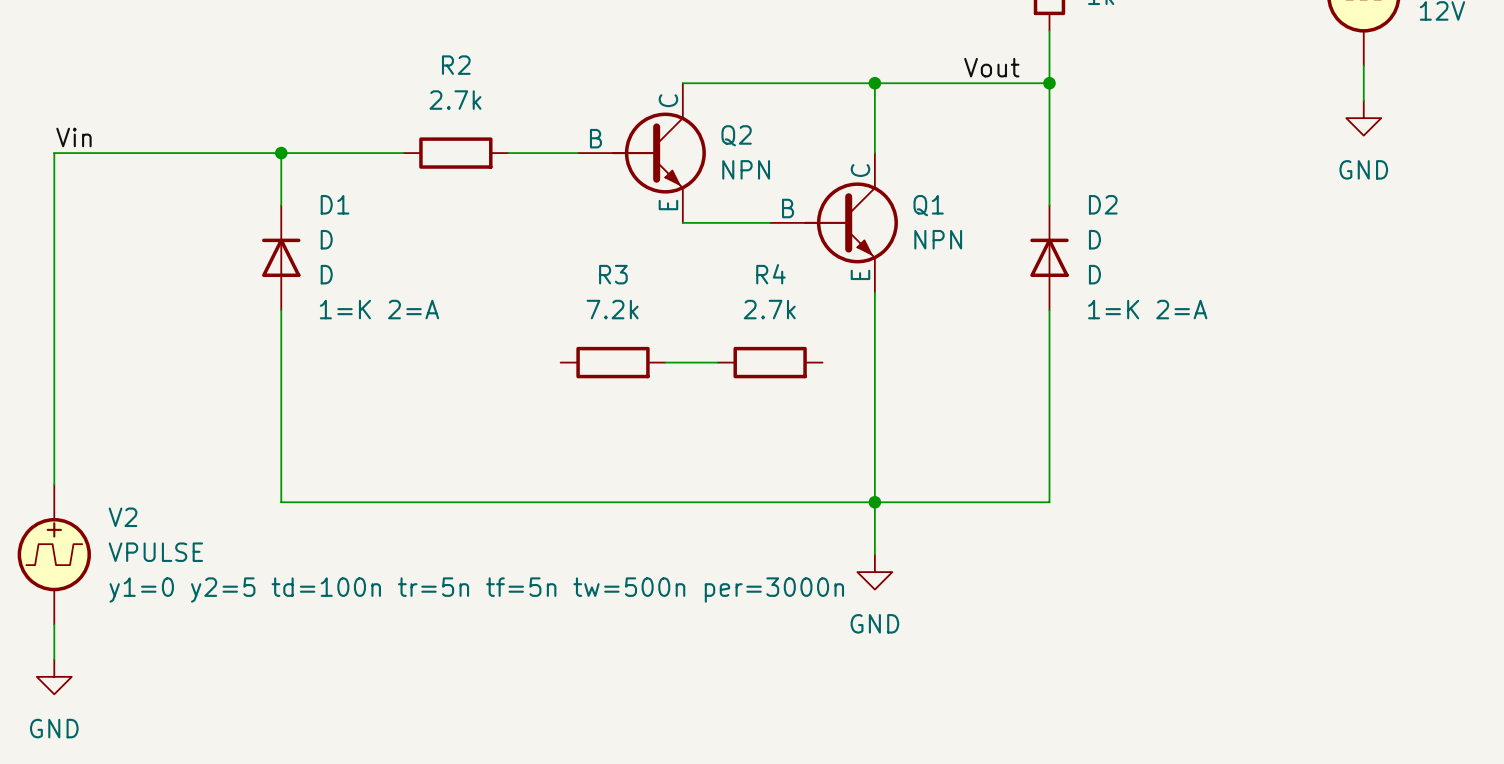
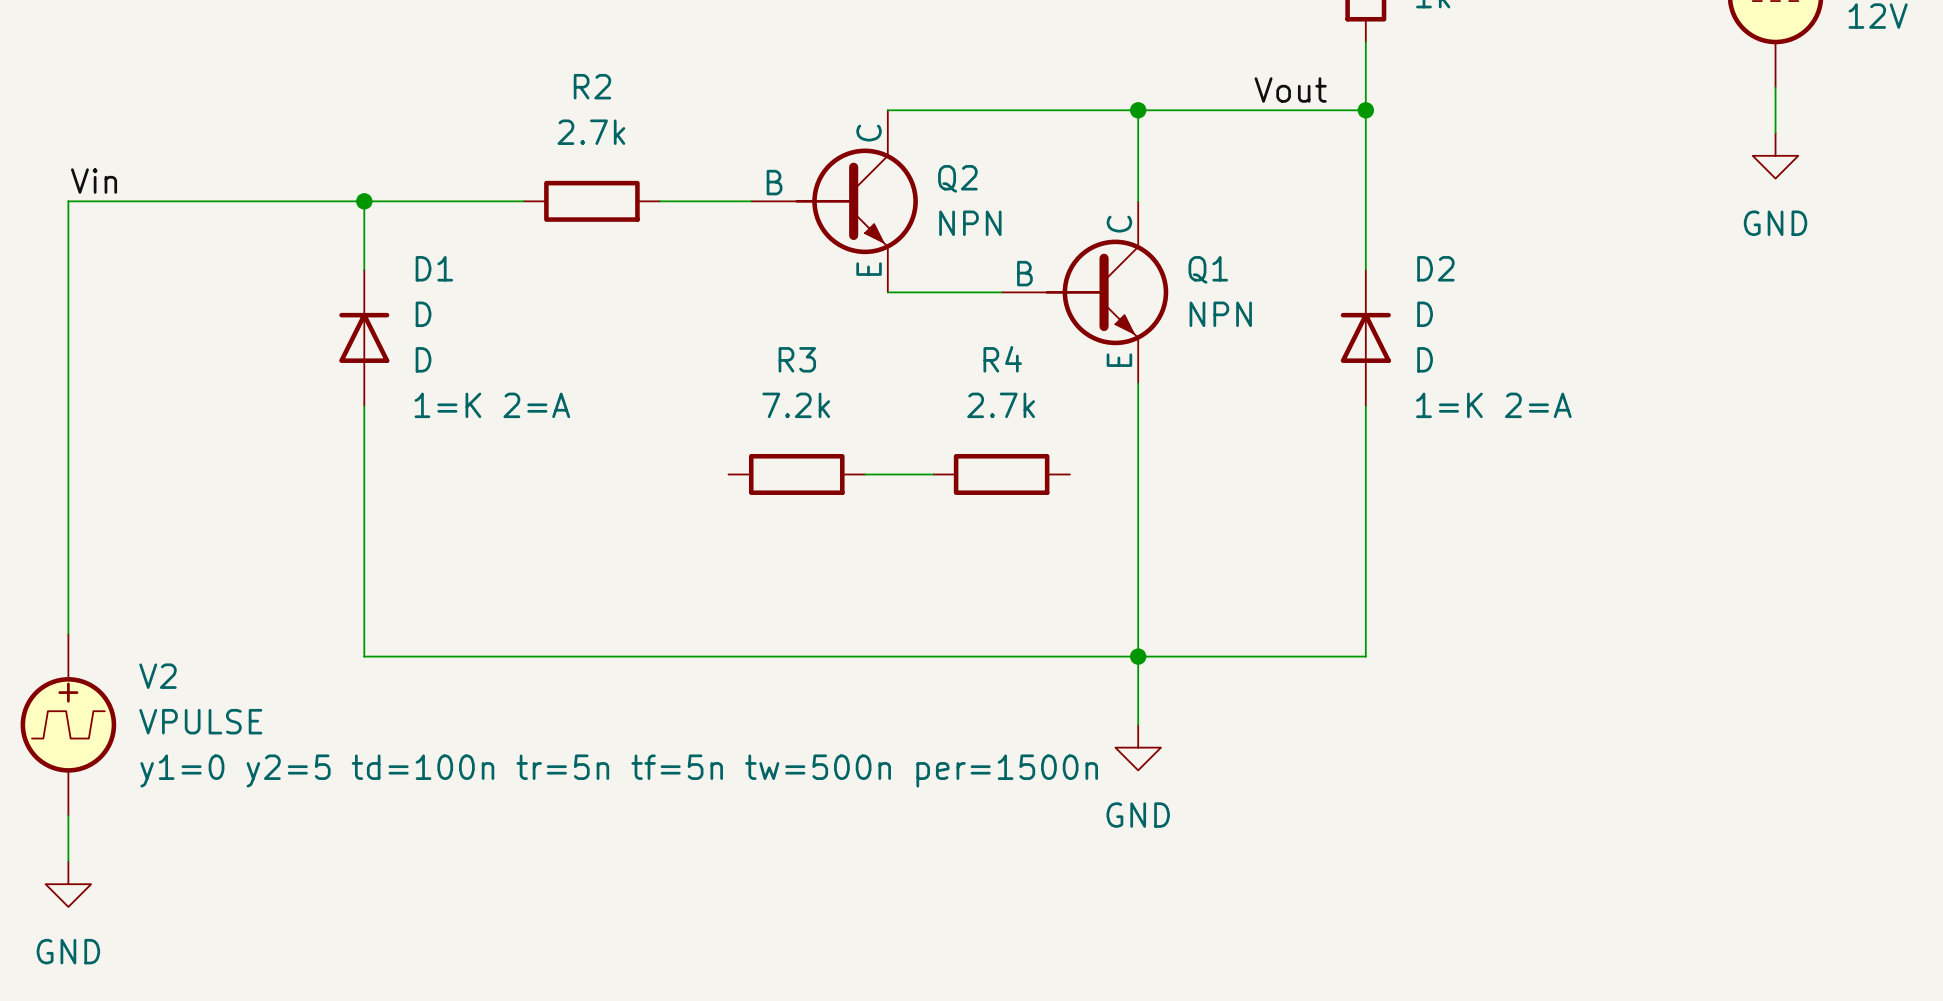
V2 text: y1=0 y2=5 td=100n tr=5n tf=5n tw=500n per=3000n (476, 590) -> y1=0 y2=5 td=100n tr=5n tf=5n tw=500n per=1500n (619, 771)

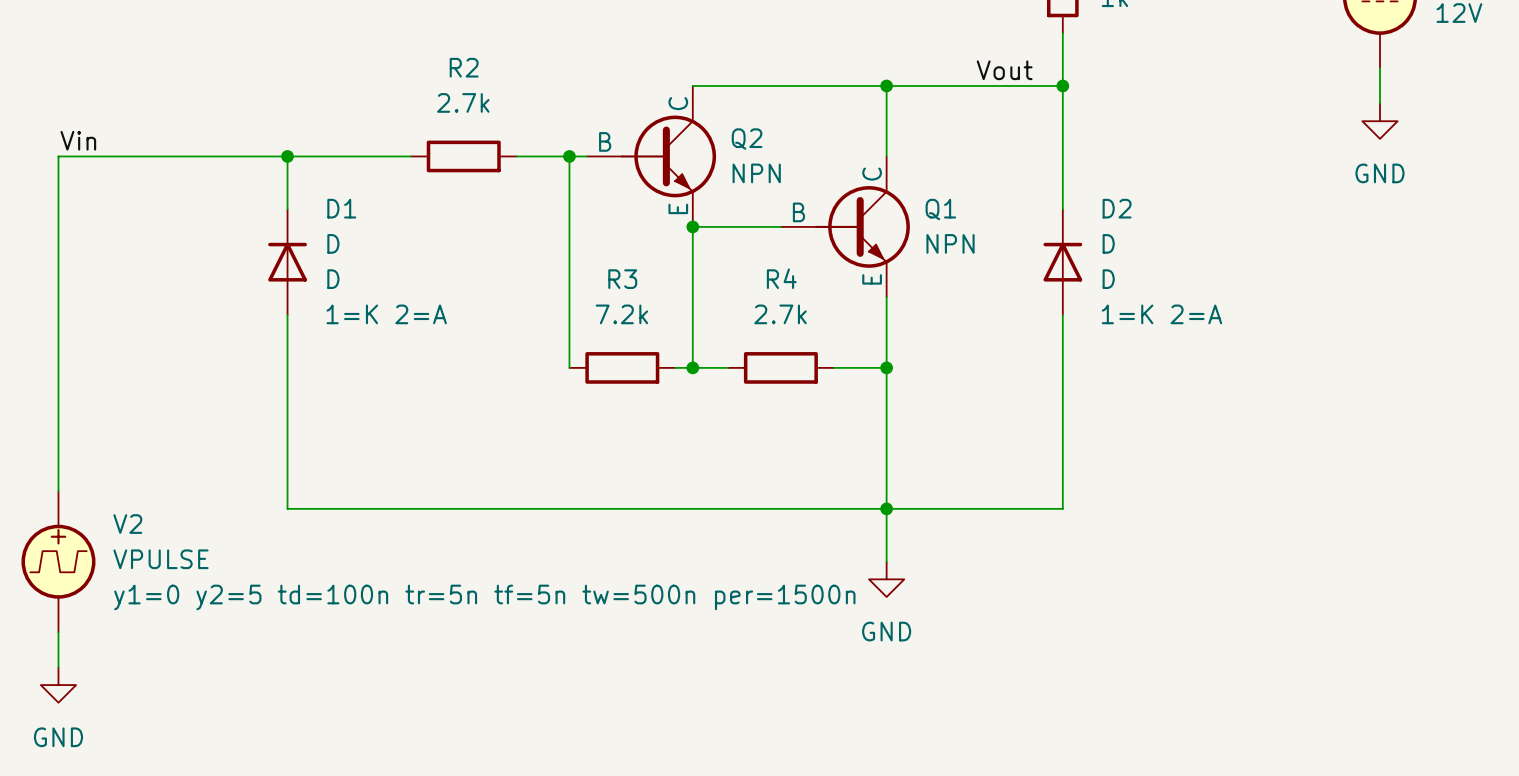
wire: none -> (569, 156) (569, 367)
junction: none -> (569, 156)
wire: none -> (692, 226) (692, 367)
junction: none -> (692, 226)
junction: none -> (692, 367)
wire: none -> (833, 367) (886, 367)
junction: none -> (886, 367)

